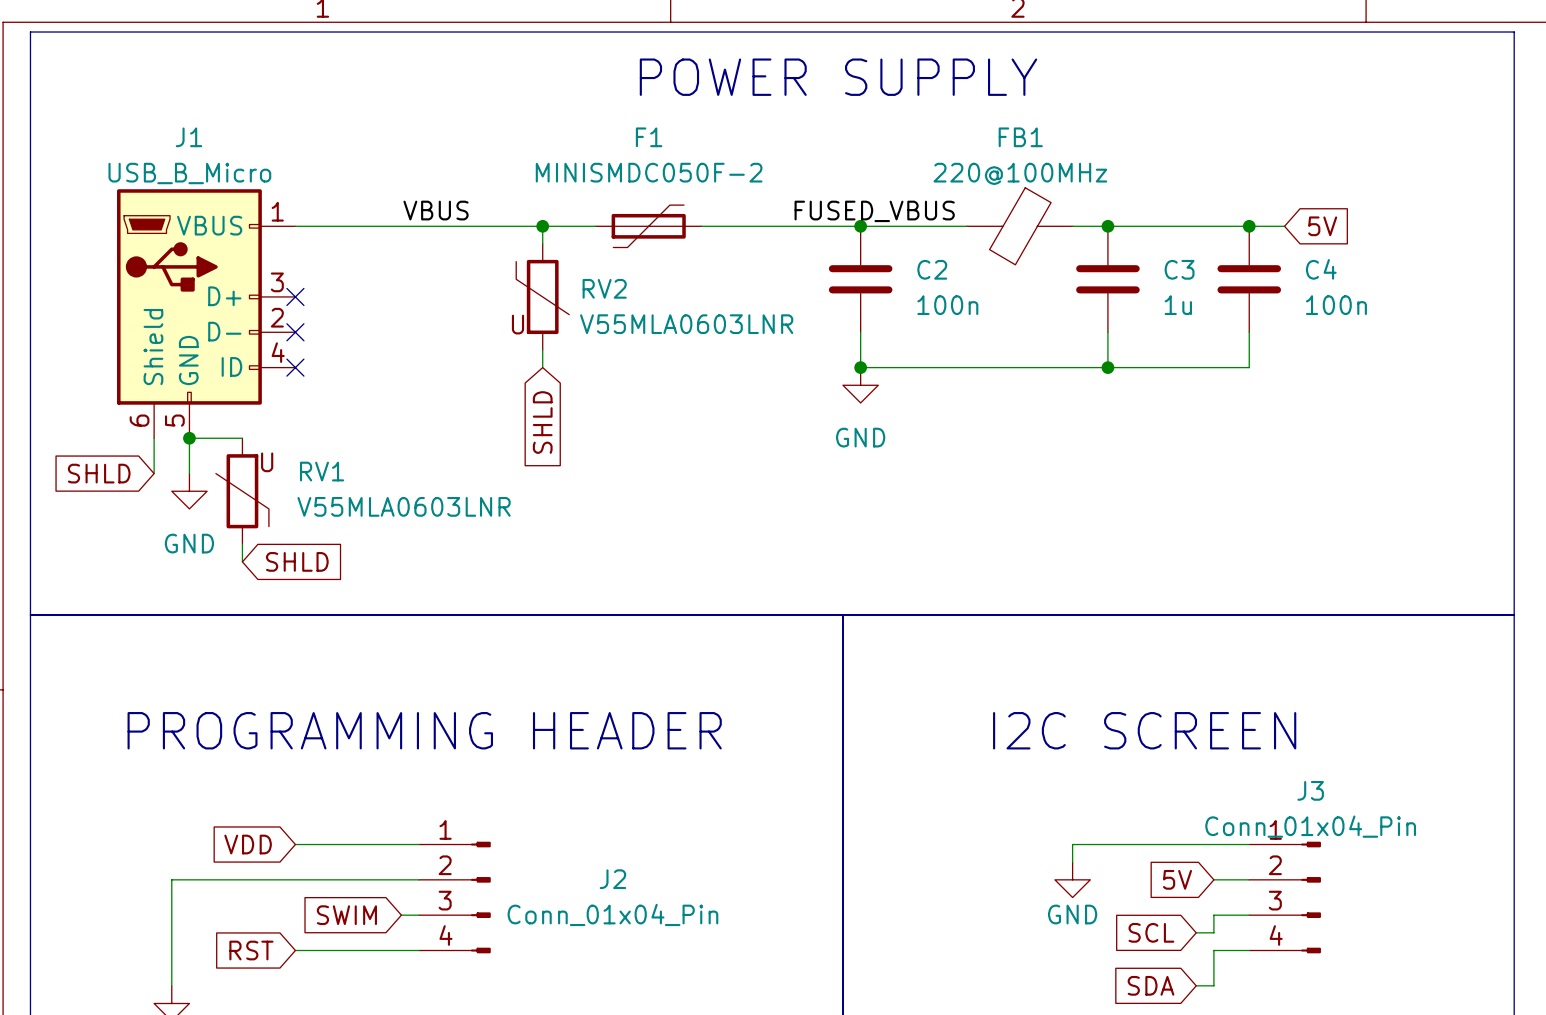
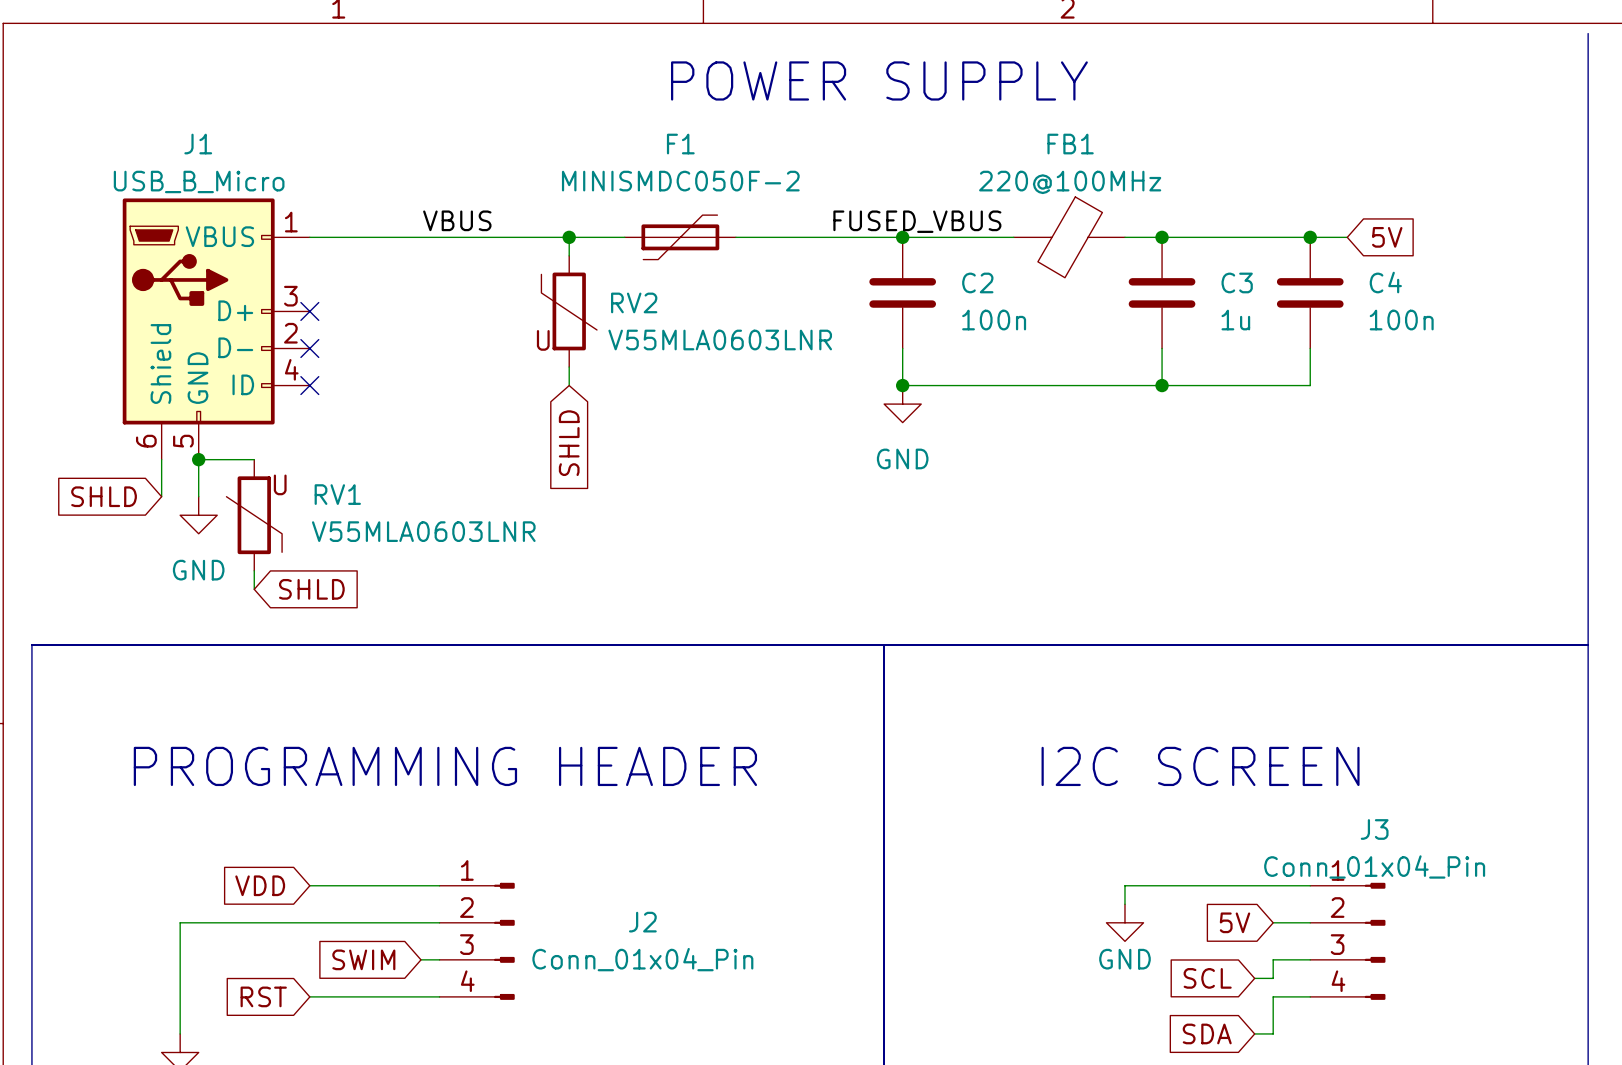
line: (1514, 32) (30, 32) (30, 614) -> none

